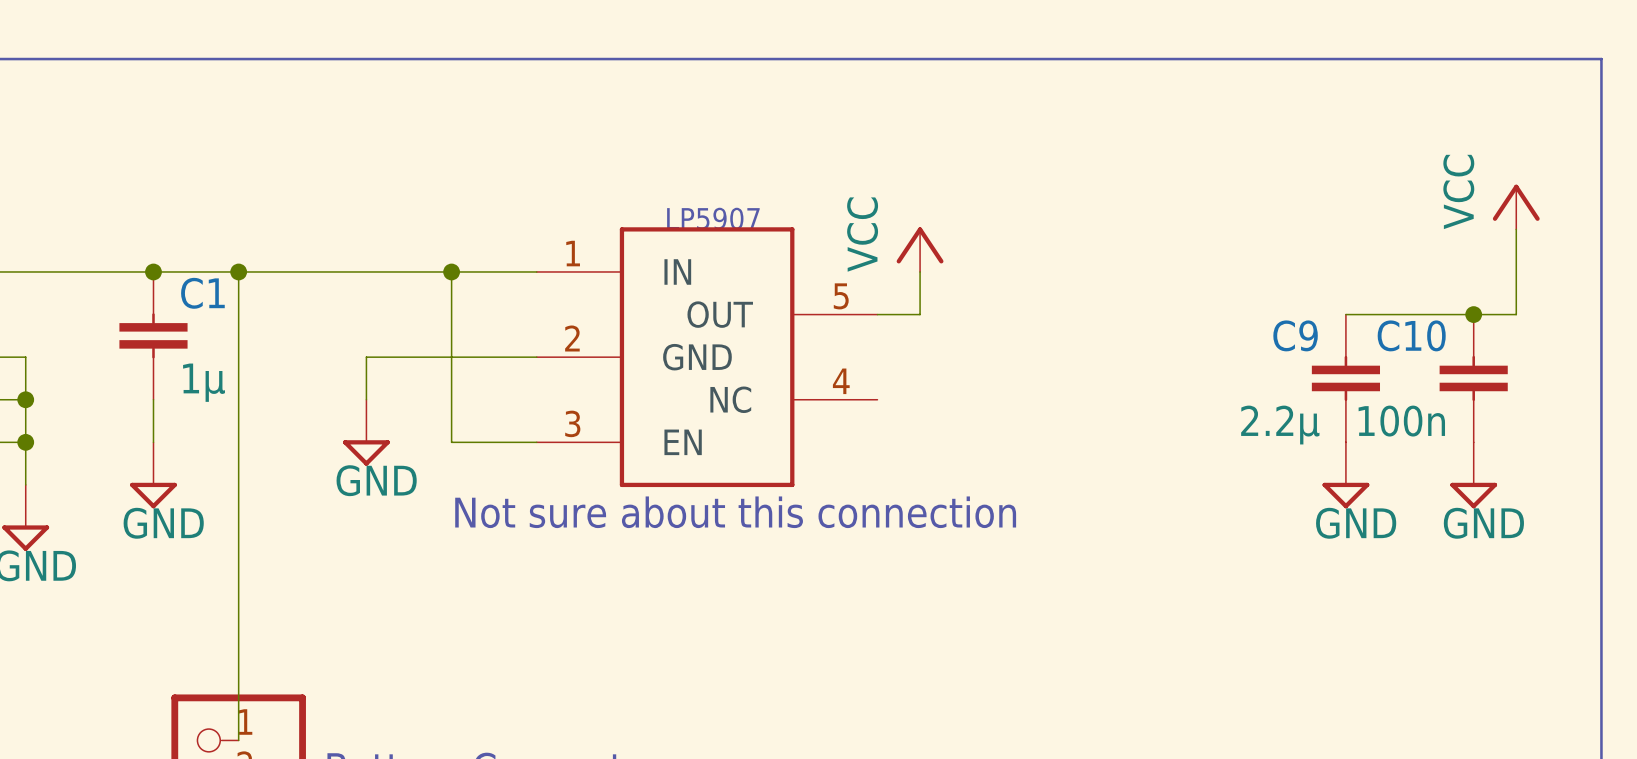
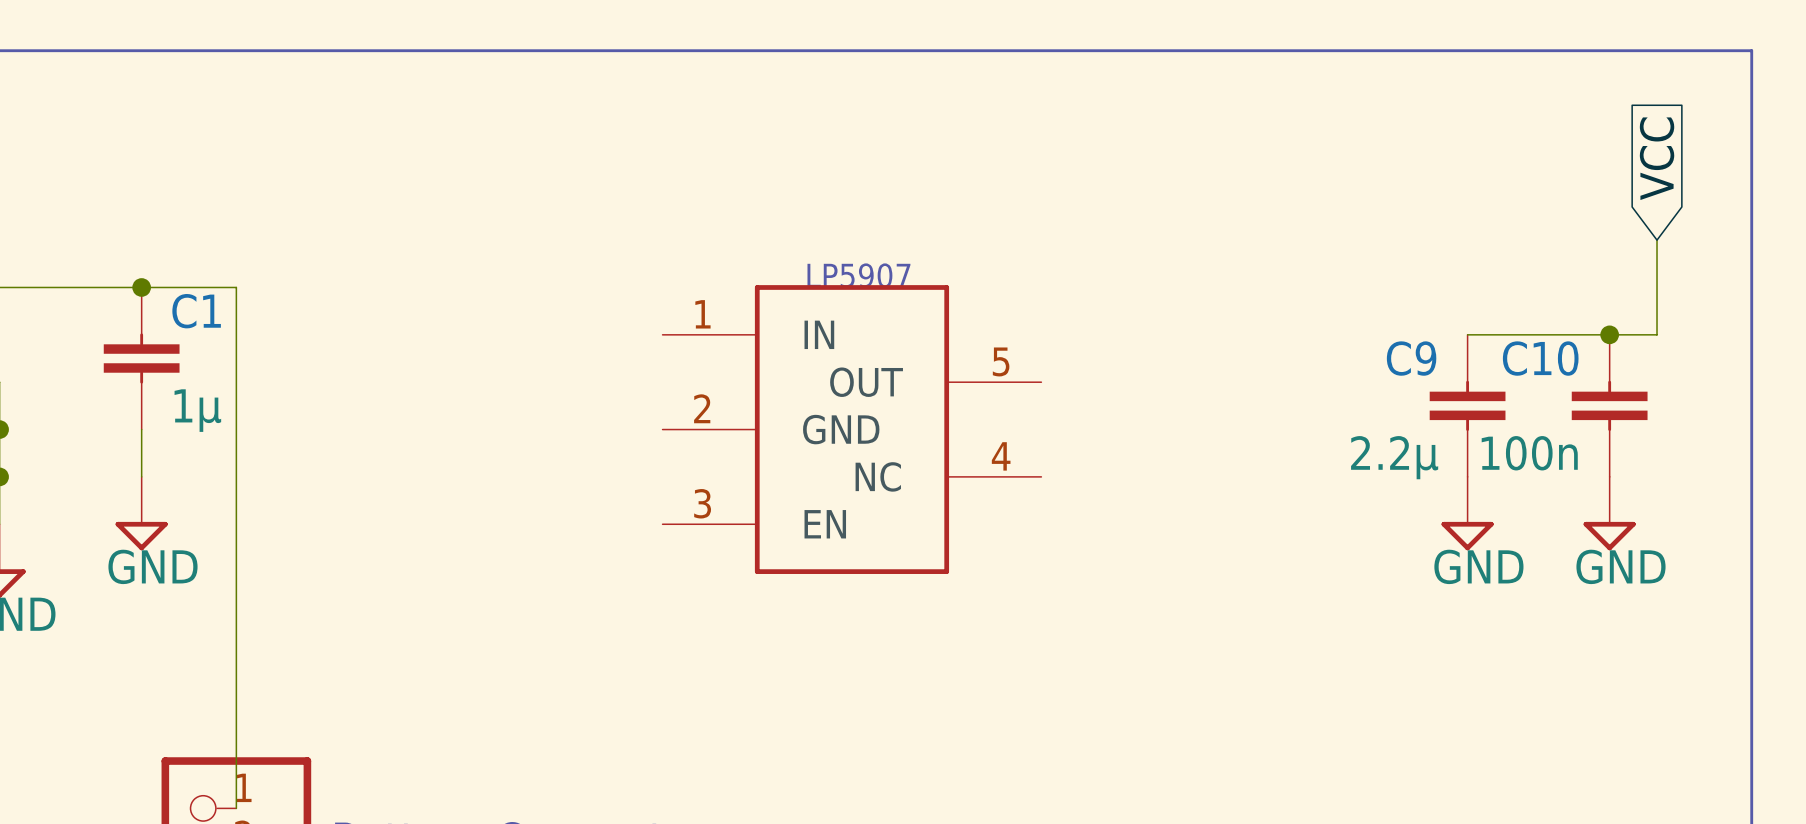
global label: none -> VCC (1657, 158)
power symbol: VCC (1516, 207) -> none
power symbol: VCC (920, 249) -> none
wire: (238, 271) (536, 271) -> none
junction: (238, 271) -> none
wire: (451, 271) (451, 442) (536, 442) -> none
junction: (451, 271) -> none
wire: (920, 271) (920, 314) (877, 314) -> none
wire: (536, 357) (366, 357) (366, 399) -> none
part position: (707, 357) -> (851, 429)
power symbol: GND (366, 432) -> none
text: Not sure about this connection (735, 512) -> none

